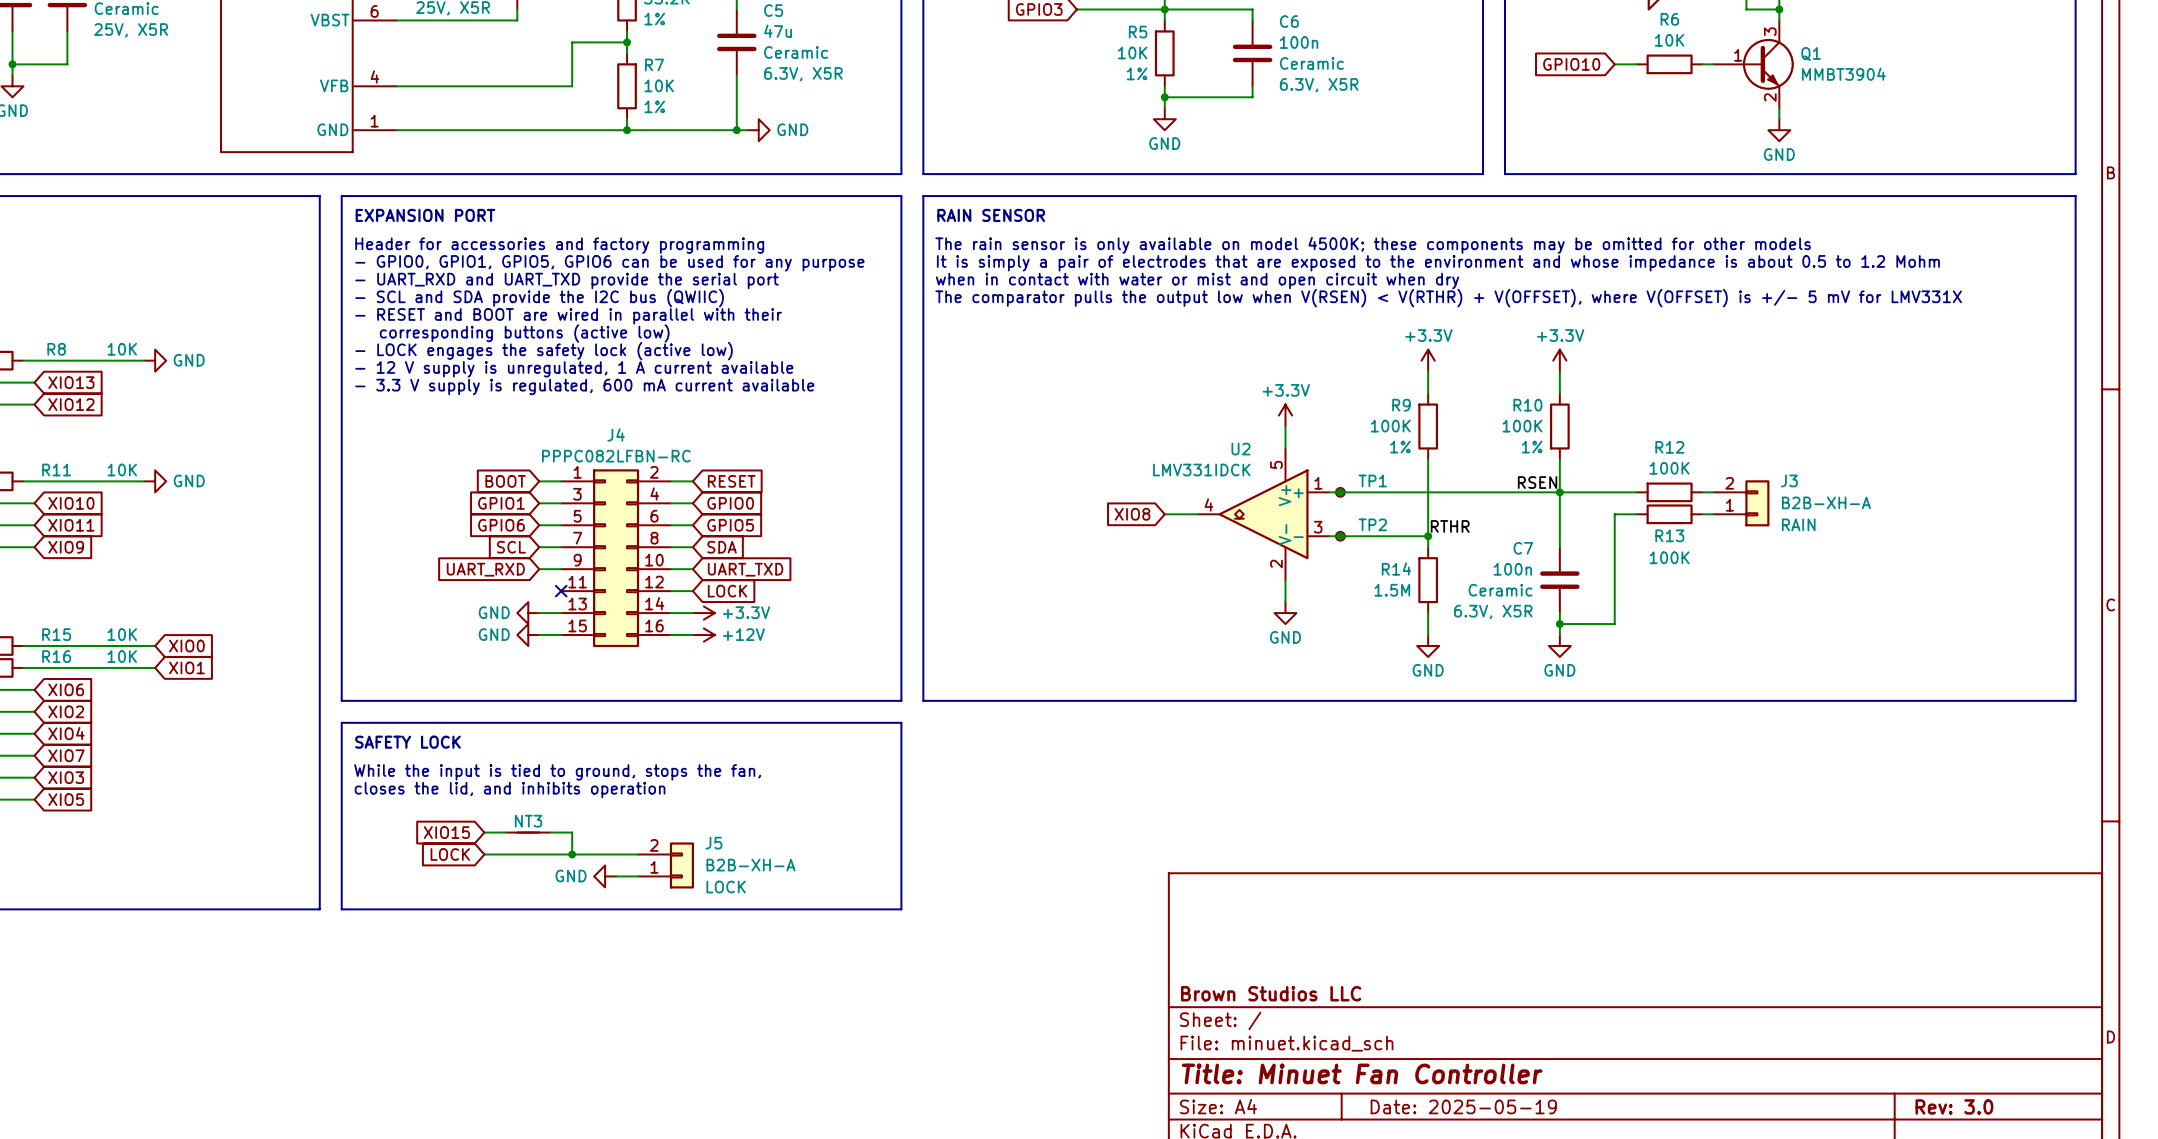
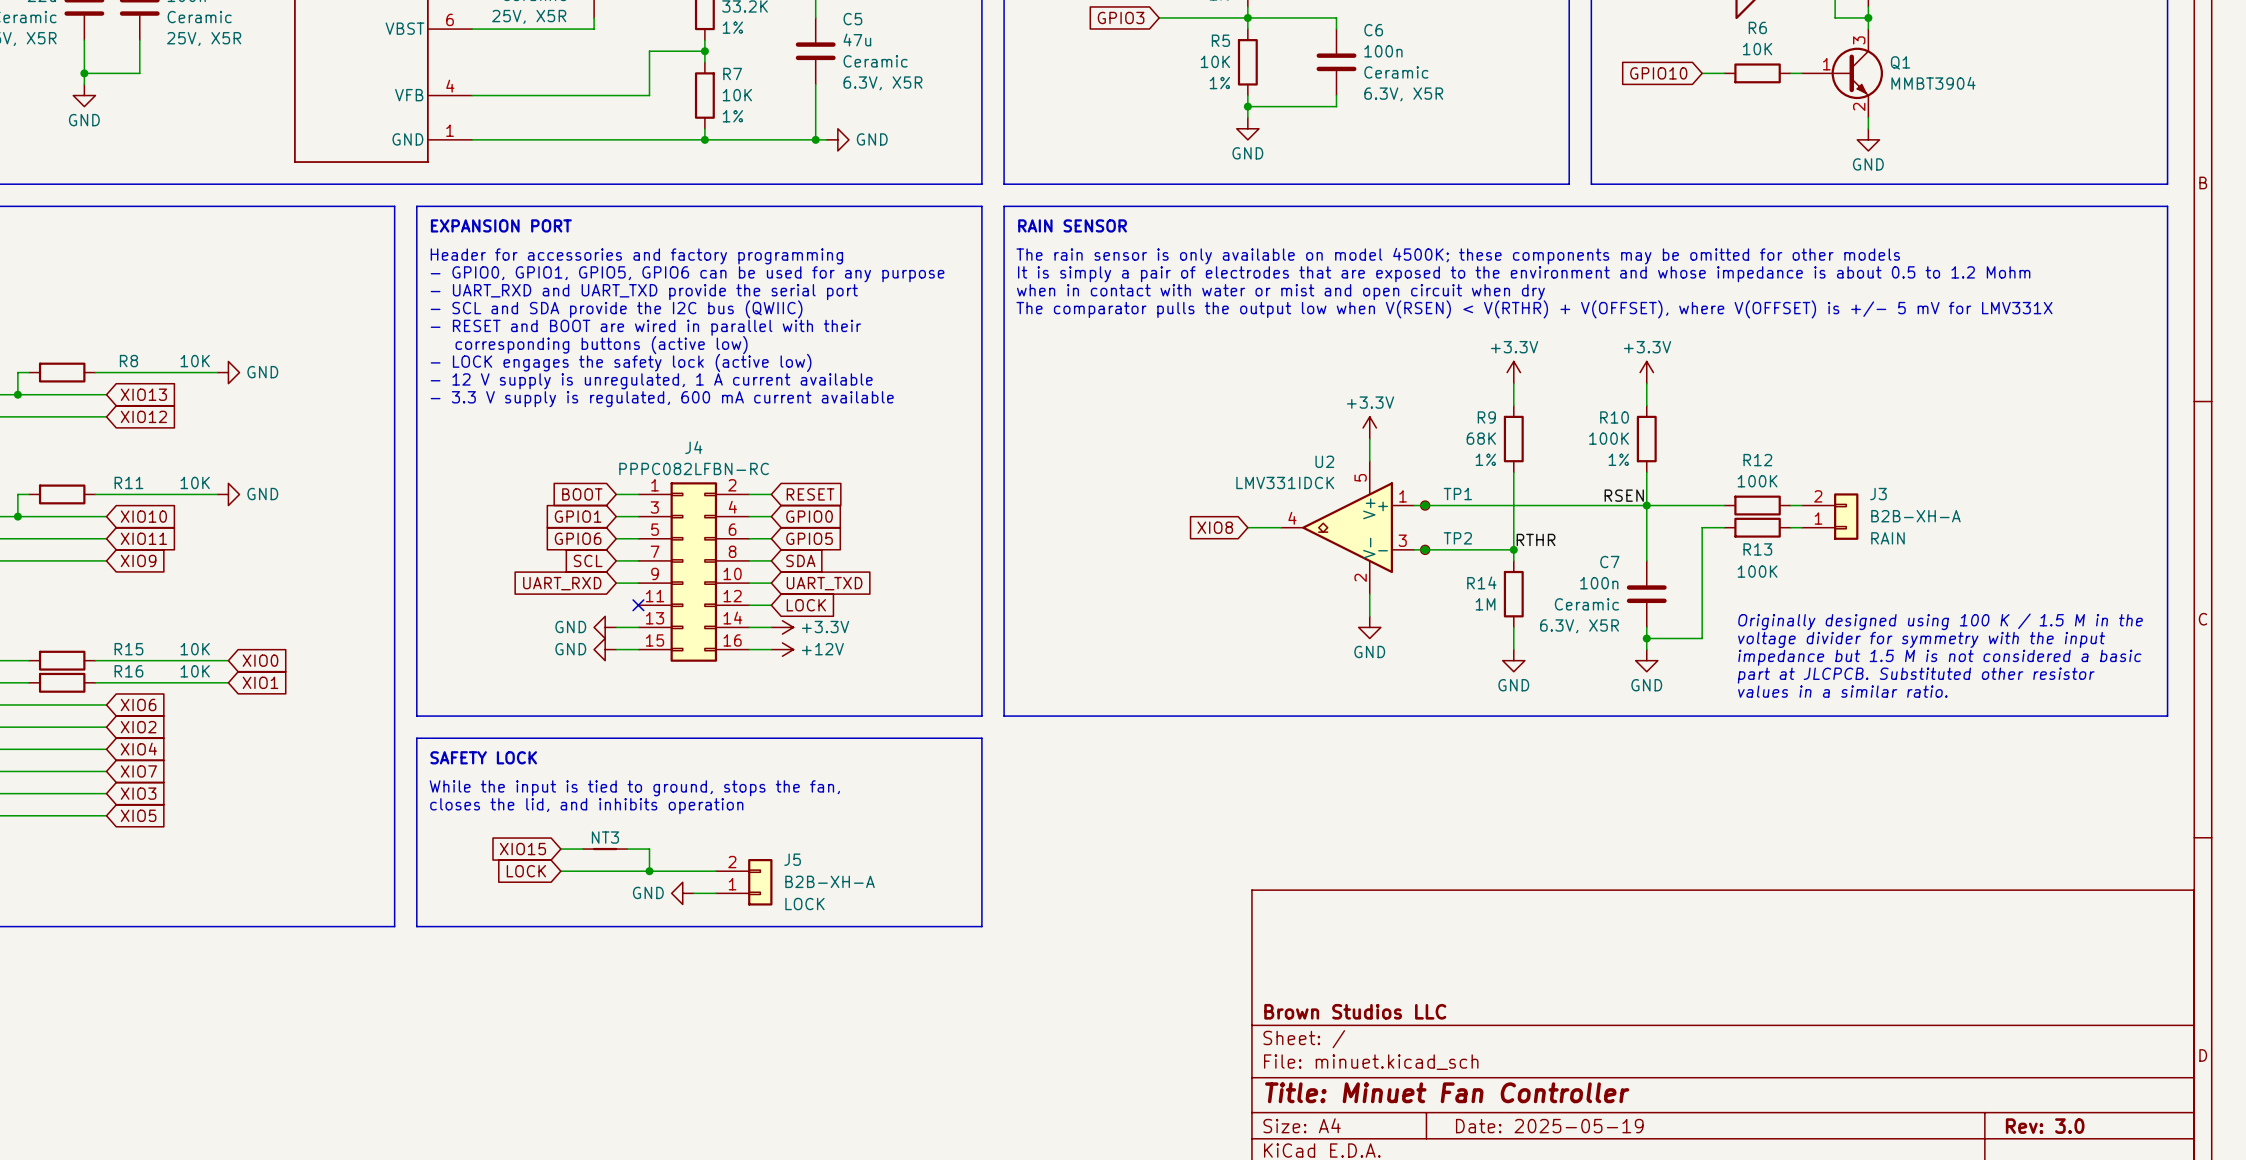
R9 value: 100K (1390, 426) -> 68K (1481, 438)
R14 value: 1.5M (1392, 590) -> 1M (1485, 604)
text: none -> Originally designed using 100 K / 1.5 M in the (1940, 621)
text: none -> voltage divider for symmetry with the input (1921, 639)
text: none -> impedance but 1.5 M is not considered a basic (1939, 657)
text: none -> part at JLCPCB. Substituted other resistor (1916, 675)
text: none -> values in a similar ratio. (1842, 691)

